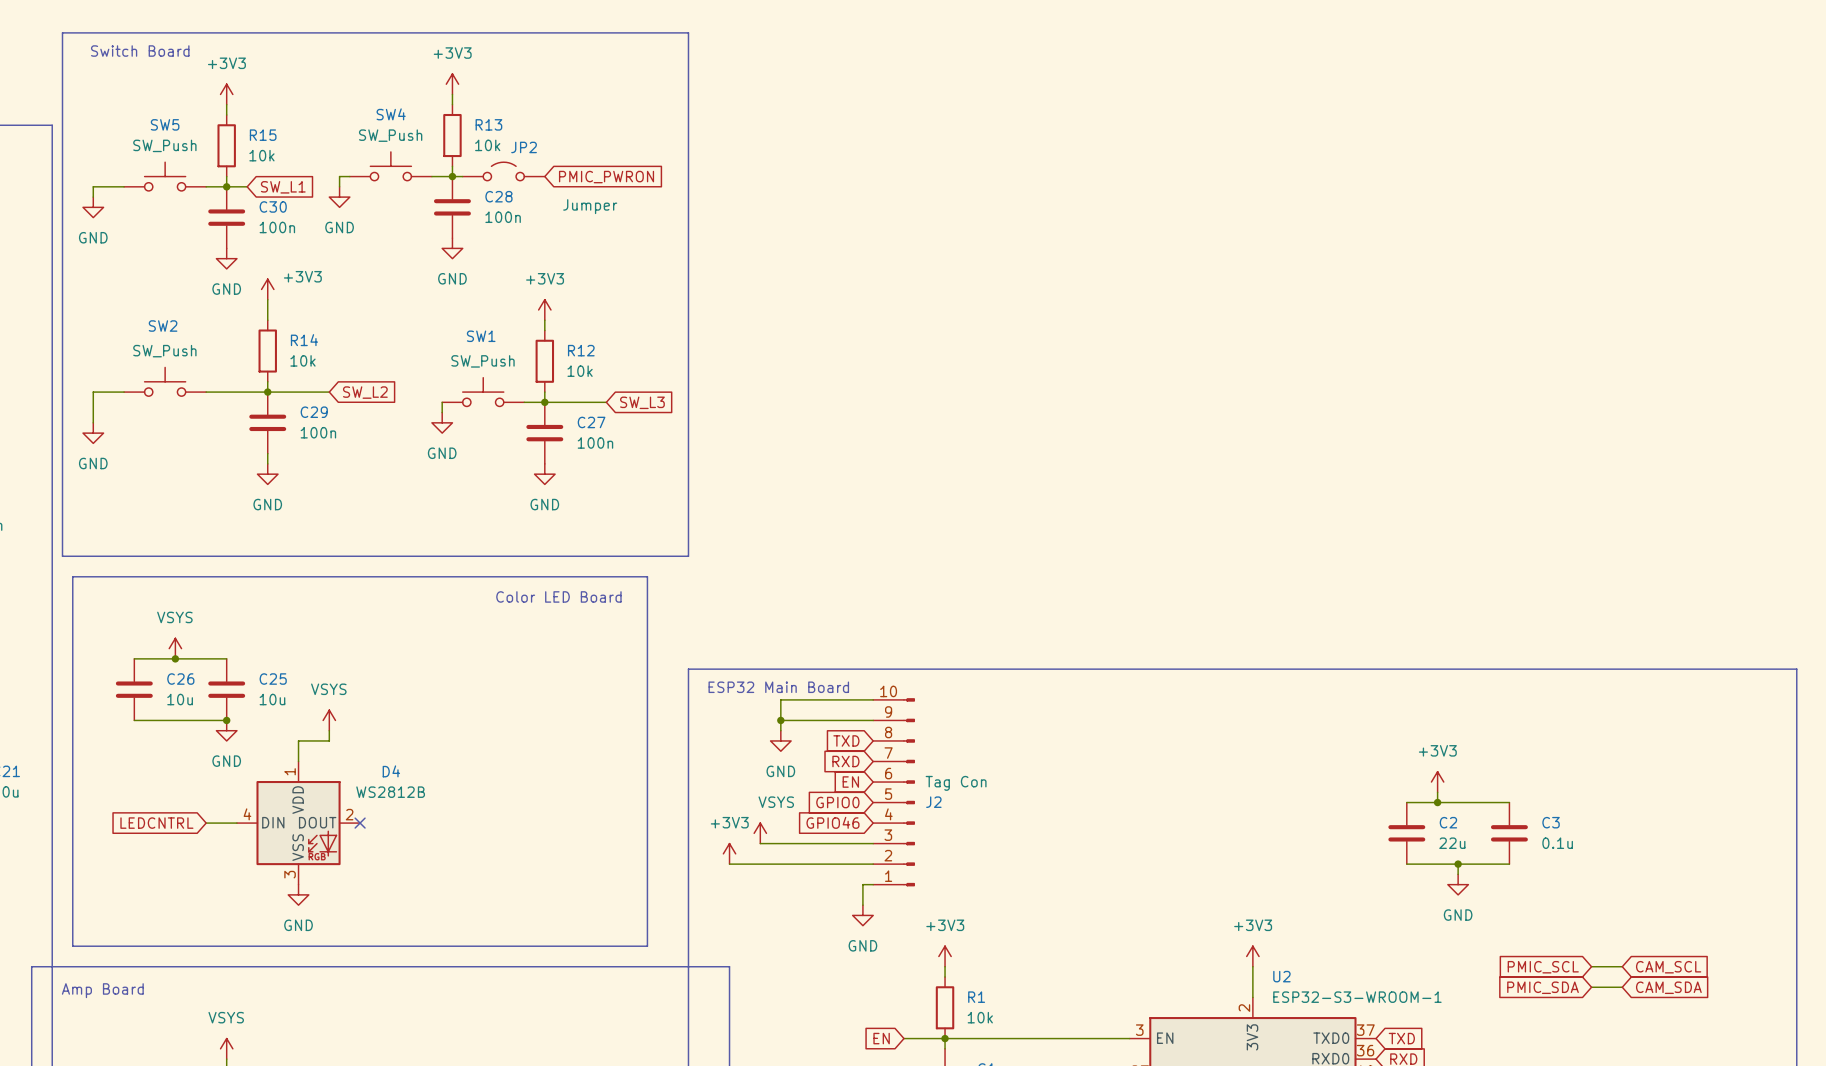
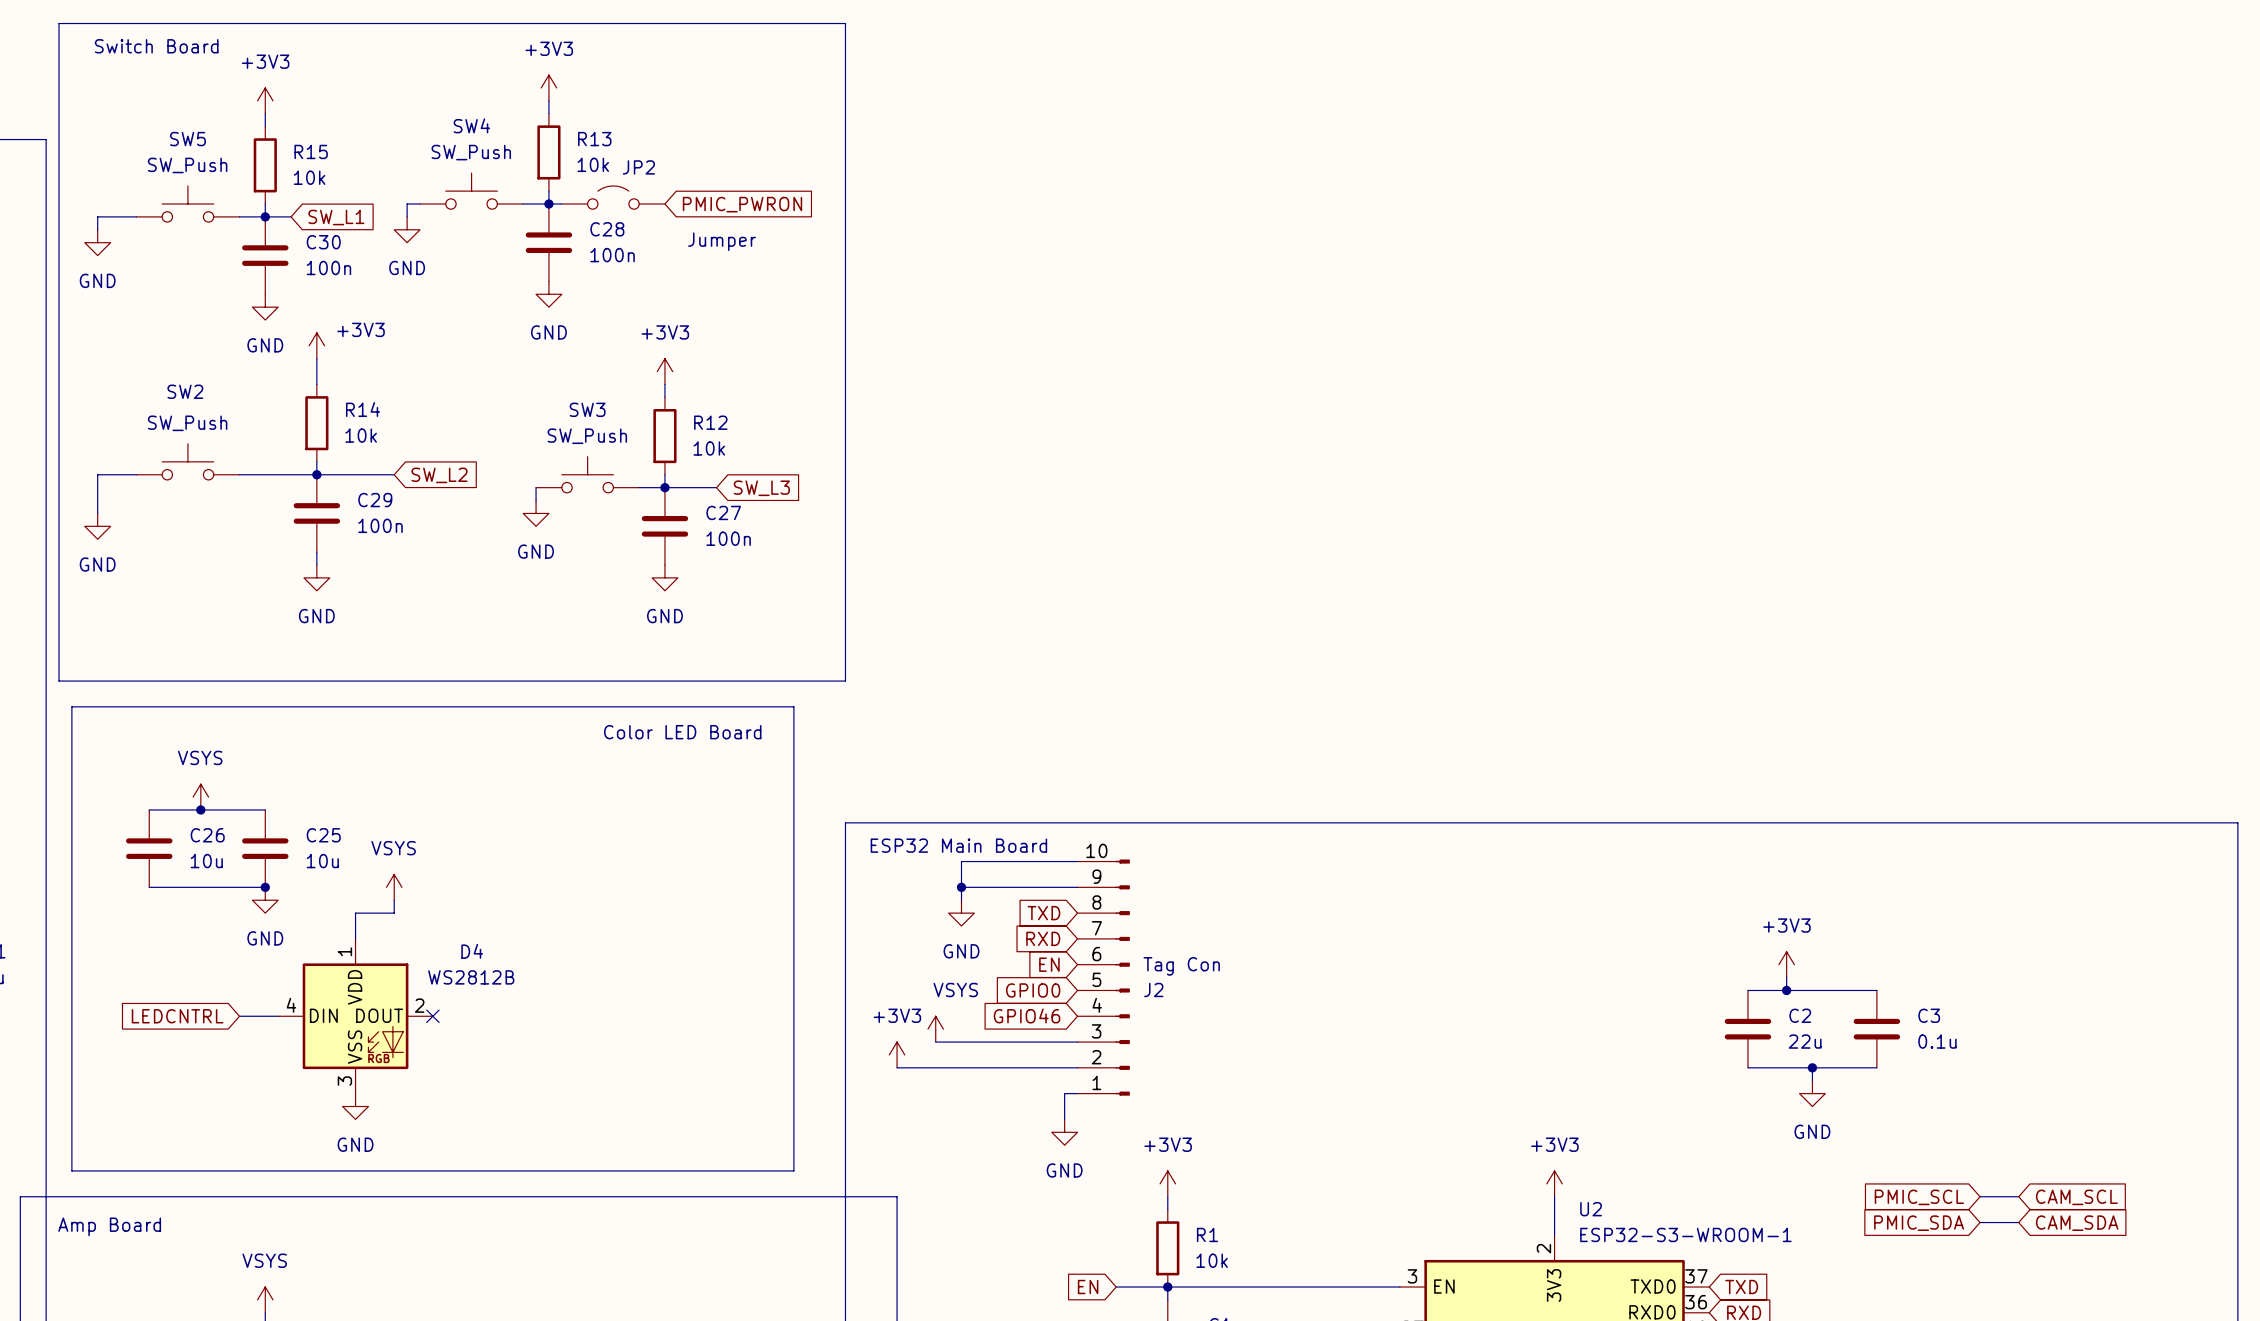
SW1 name: SW1 (481, 336) -> SW3 (587, 409)
wire: (585, 402) (606, 402) -> none
global label position: SW_L3 (642, 402) -> SW_L3 (761, 488)

